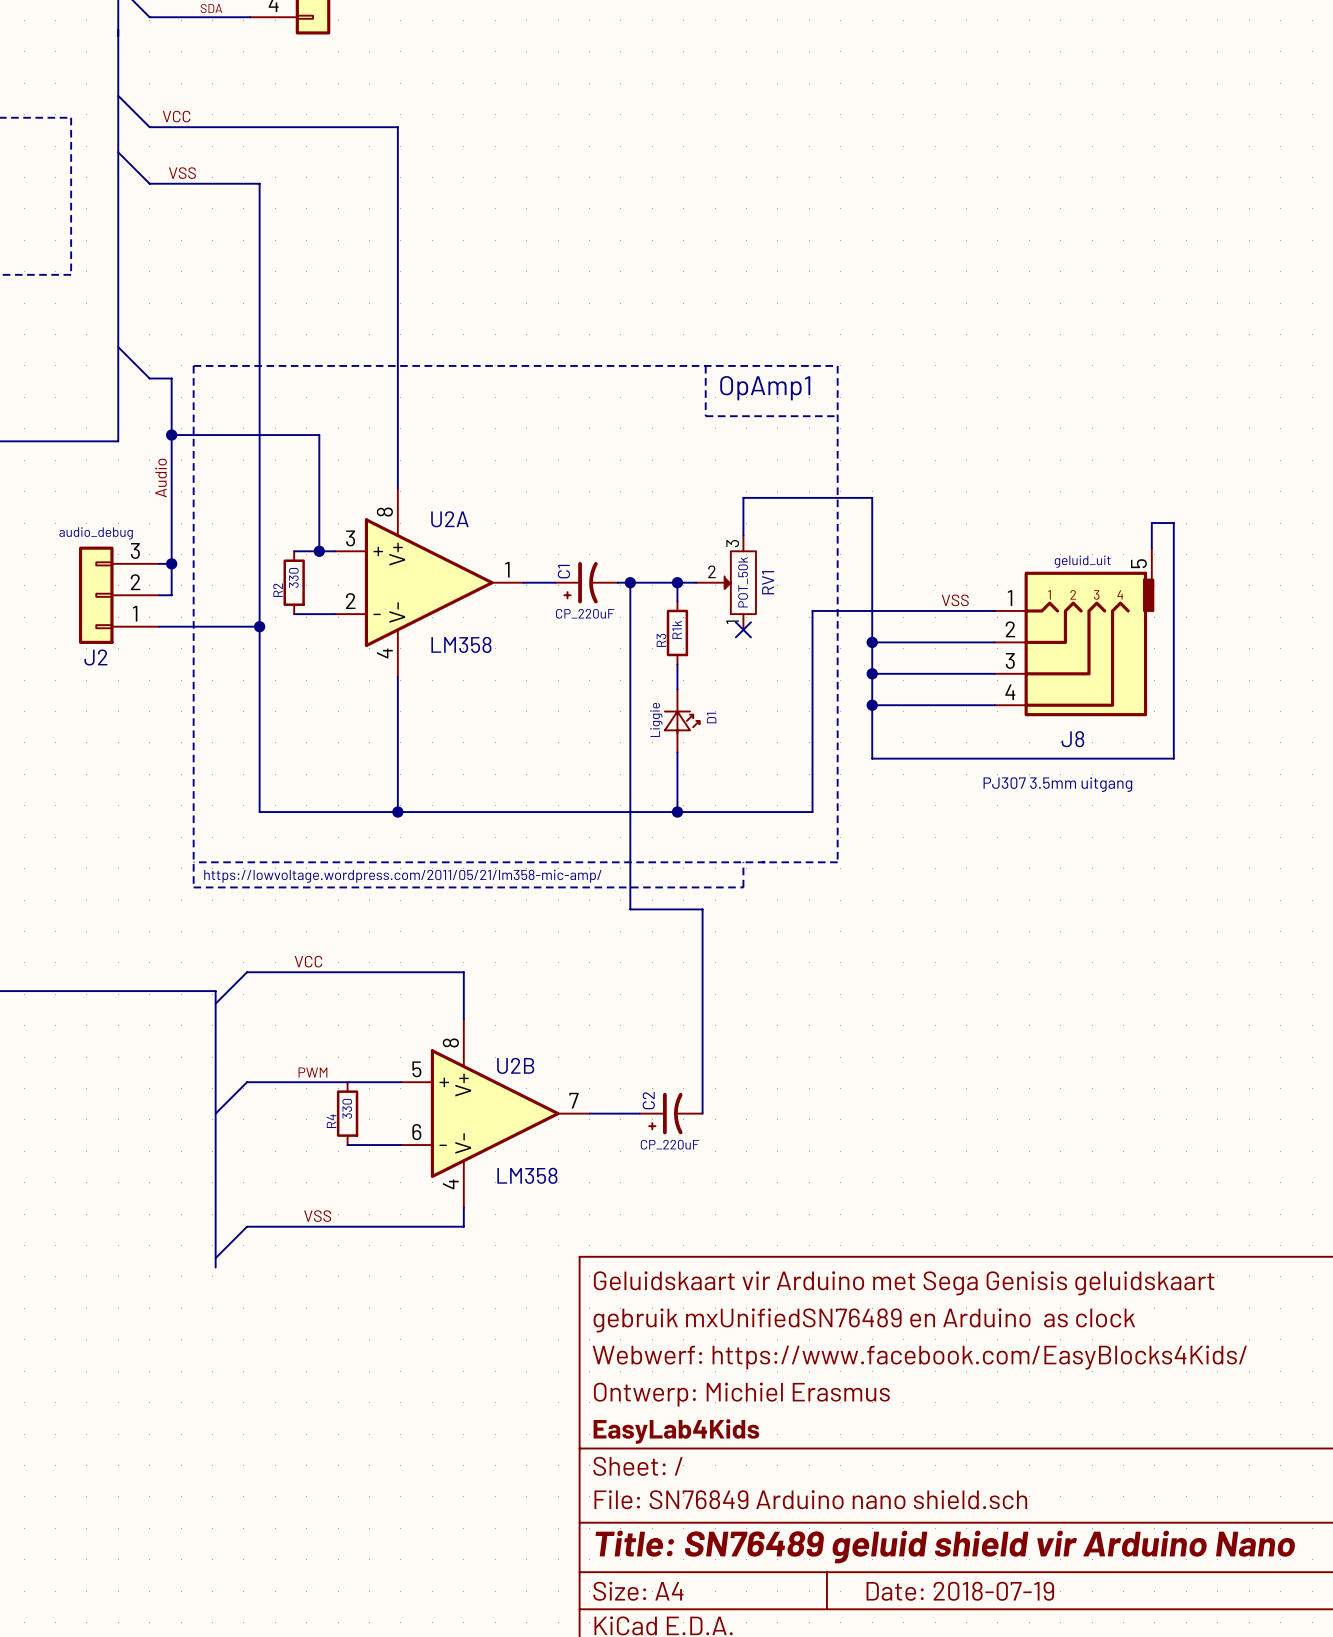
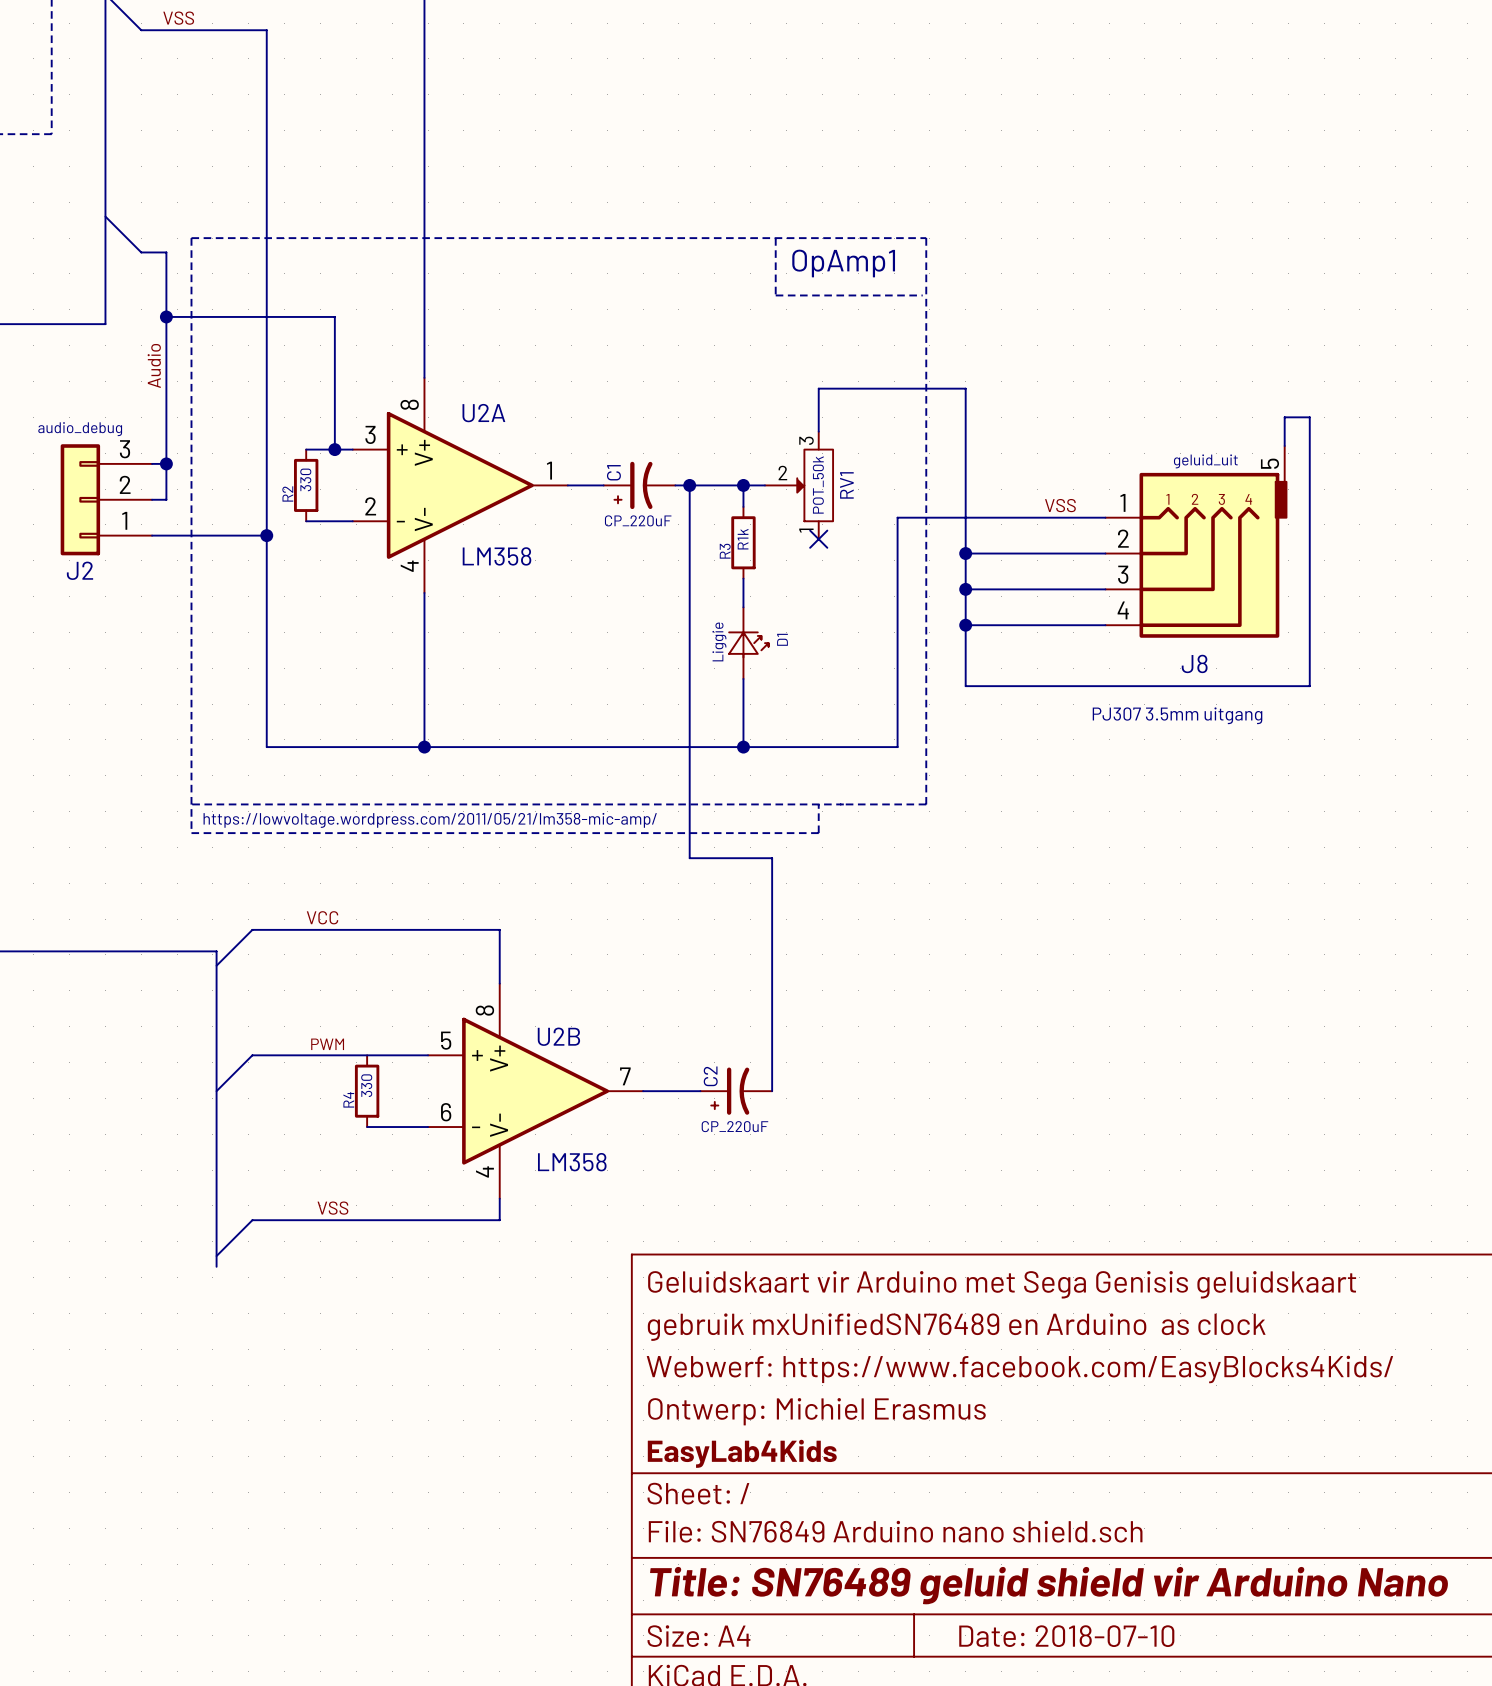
title block: Date: 2018-07-19 (960, 1591) -> Date: 2018-07-10 (1066, 1636)

